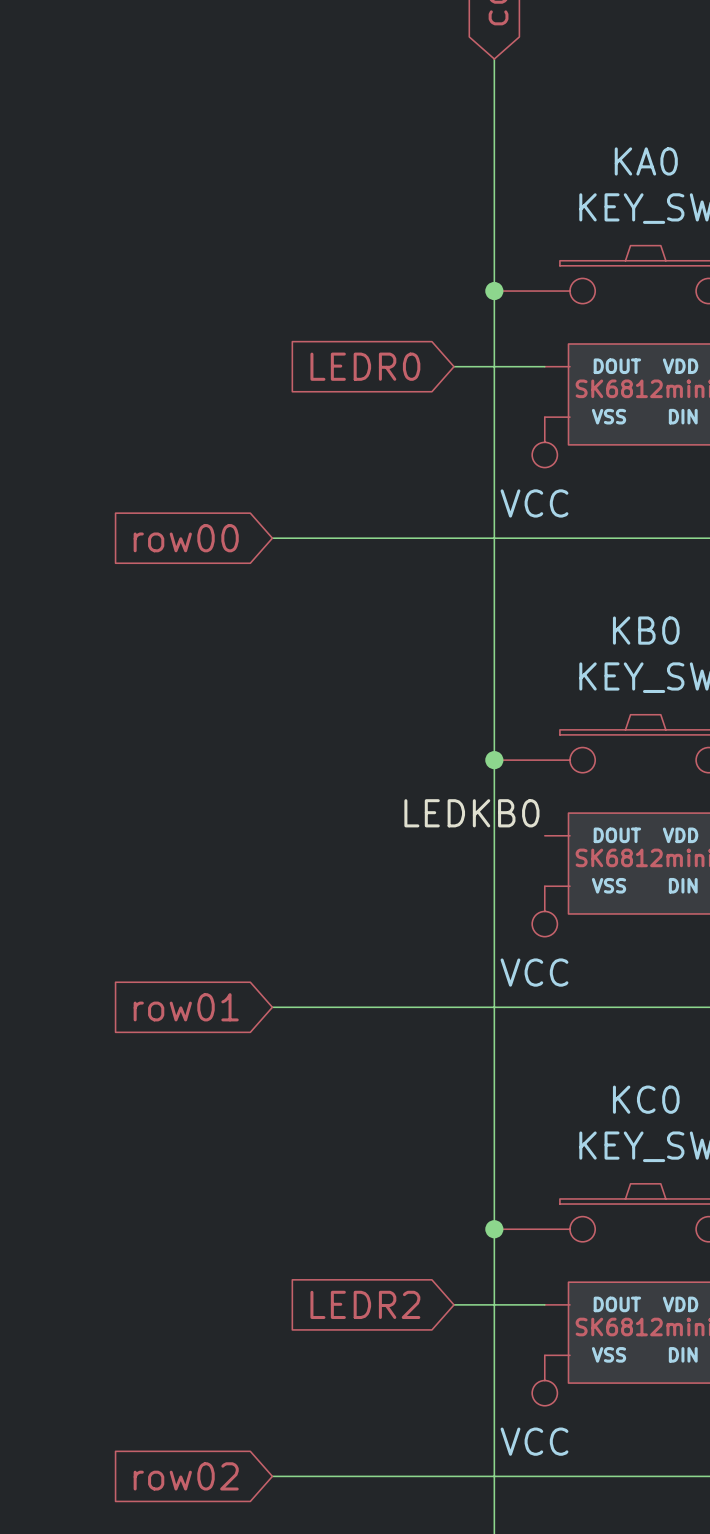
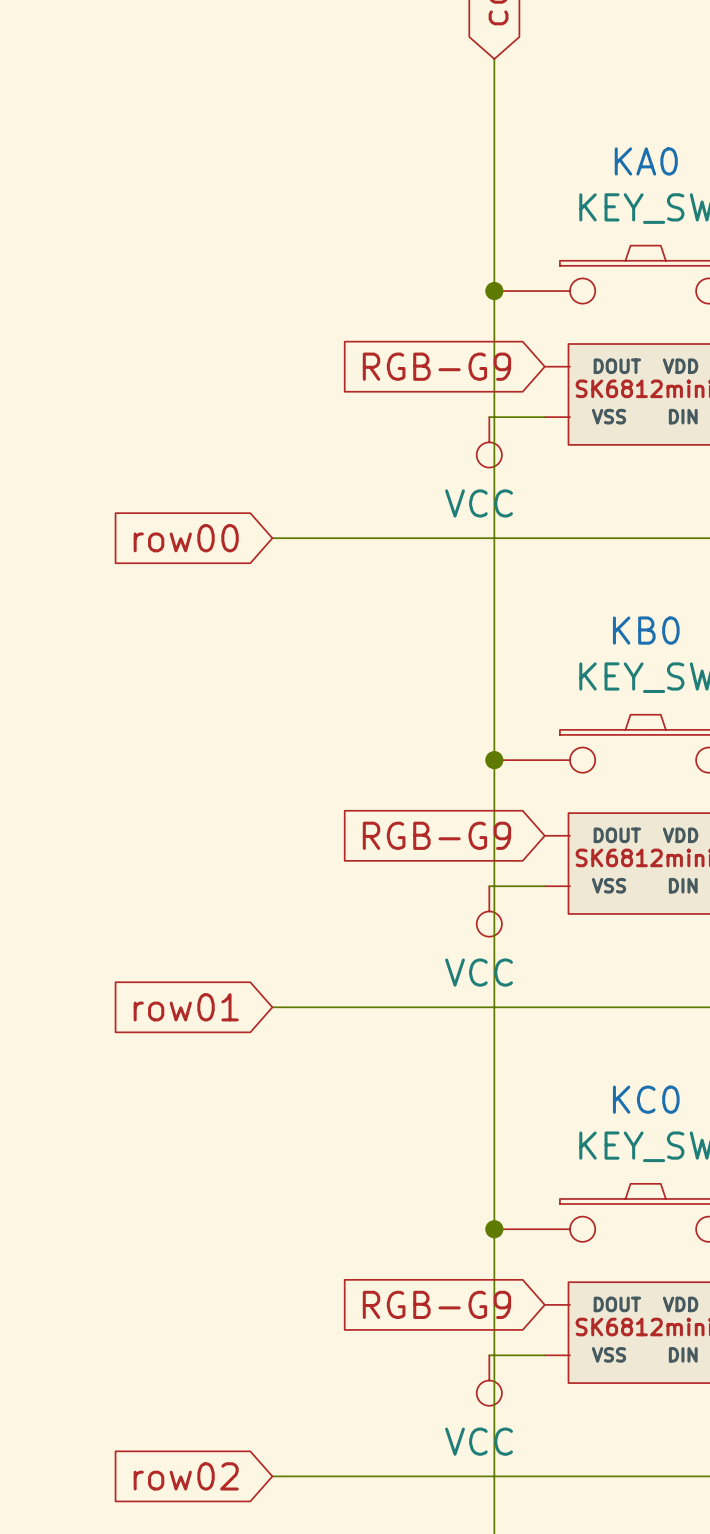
global label: LEDR0 (365, 366) -> none
global label: none -> RGB-G9 (436, 366)
wire: (453, 366) (544, 366) -> none
wire: none -> (489, 417) (544, 417)
power symbol position: VCC (544, 442) -> VCC (489, 442)
label: LEDKB0 (471, 813) -> none
global label: none -> RGB-G9 (436, 835)
wire: none -> (489, 886) (544, 886)
power symbol position: VCC (544, 911) -> VCC (489, 911)
global label: LEDR2 (365, 1304) -> none
global label: none -> RGB-G9 (436, 1304)
wire: (453, 1304) (544, 1304) -> none
wire: none -> (489, 1355) (544, 1355)
power symbol position: VCC (544, 1380) -> VCC (489, 1380)

